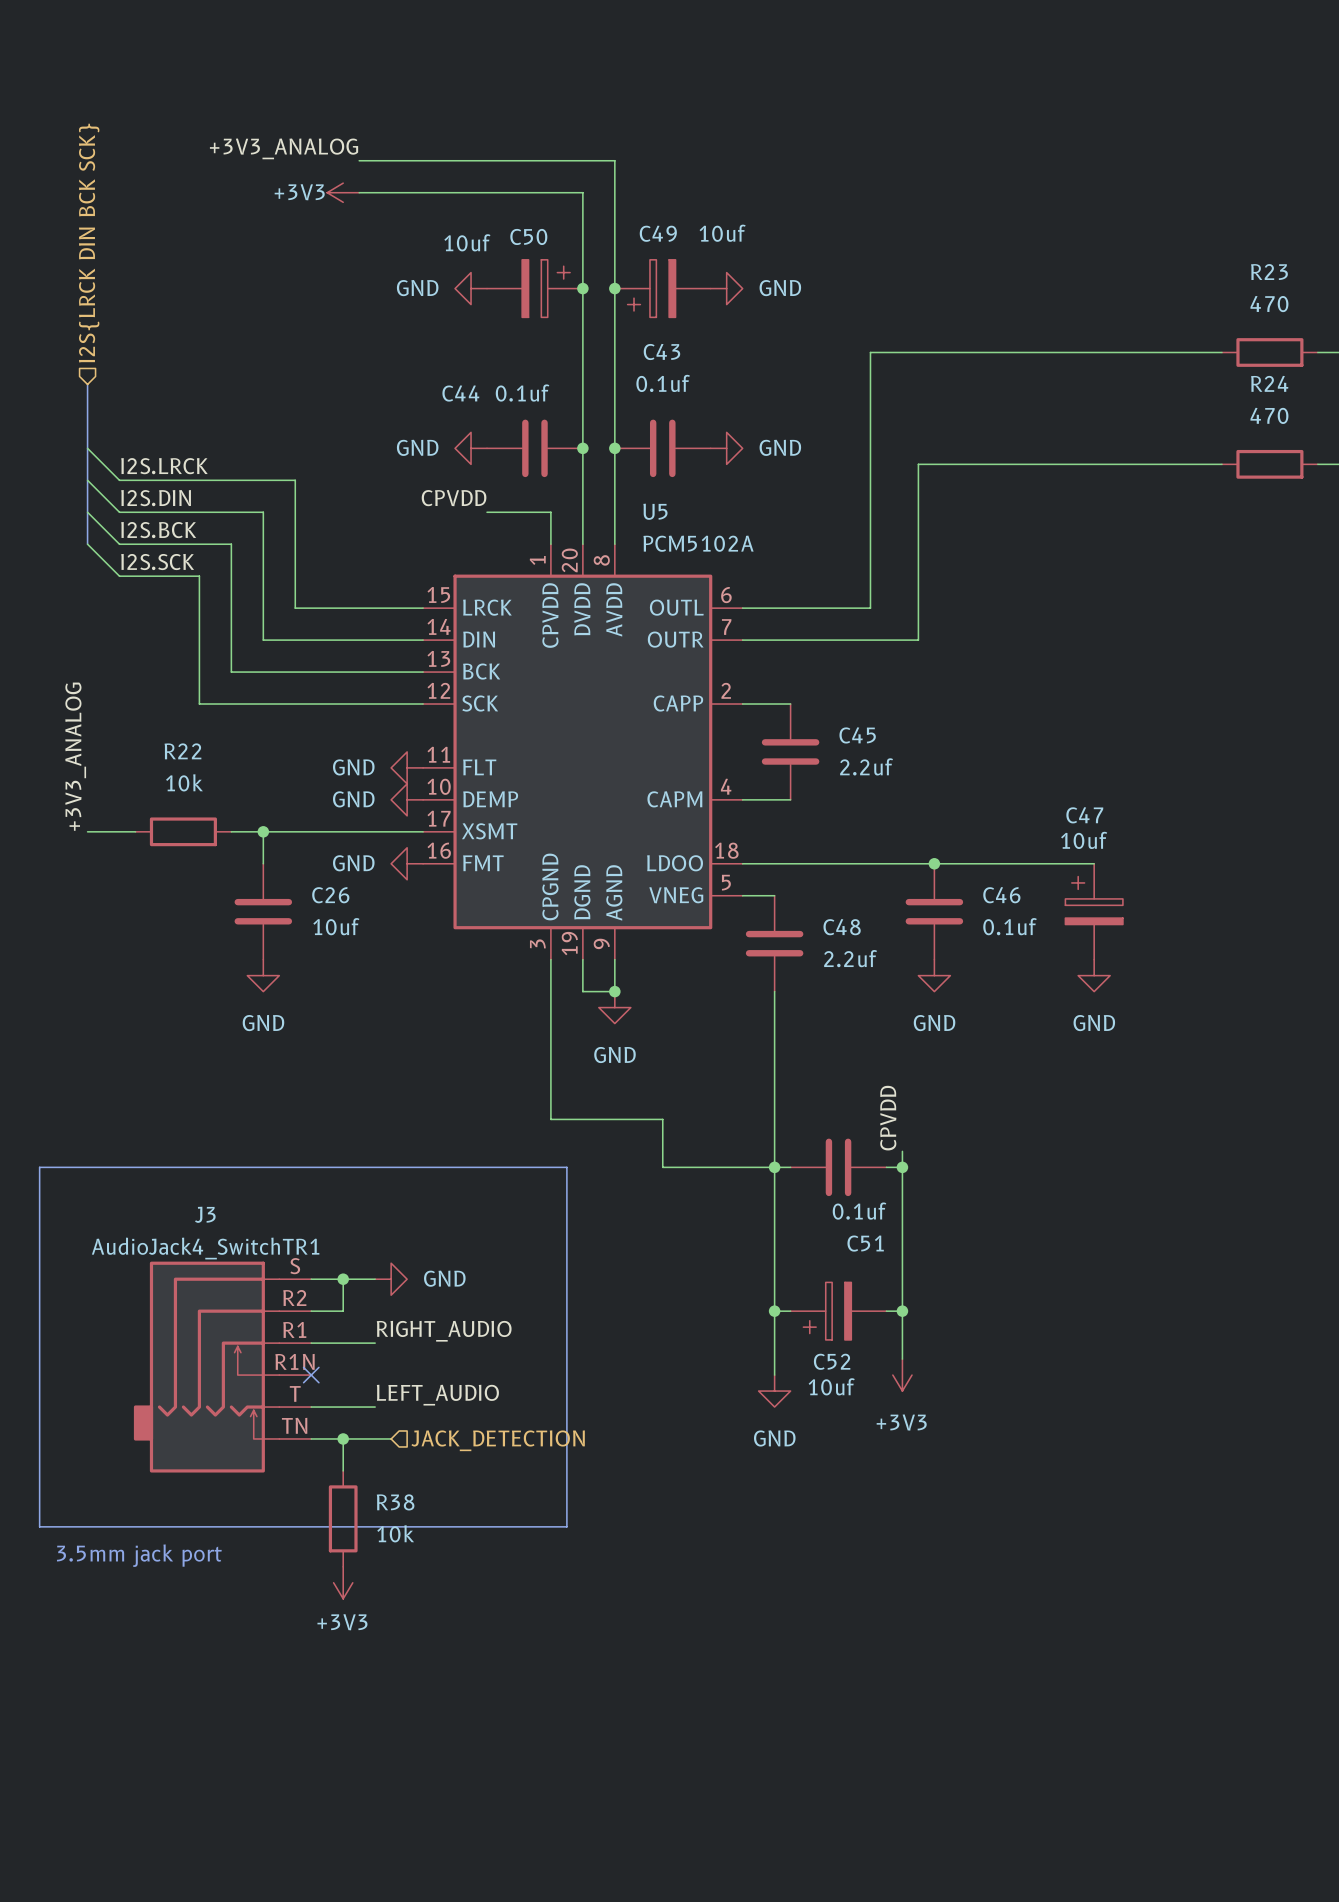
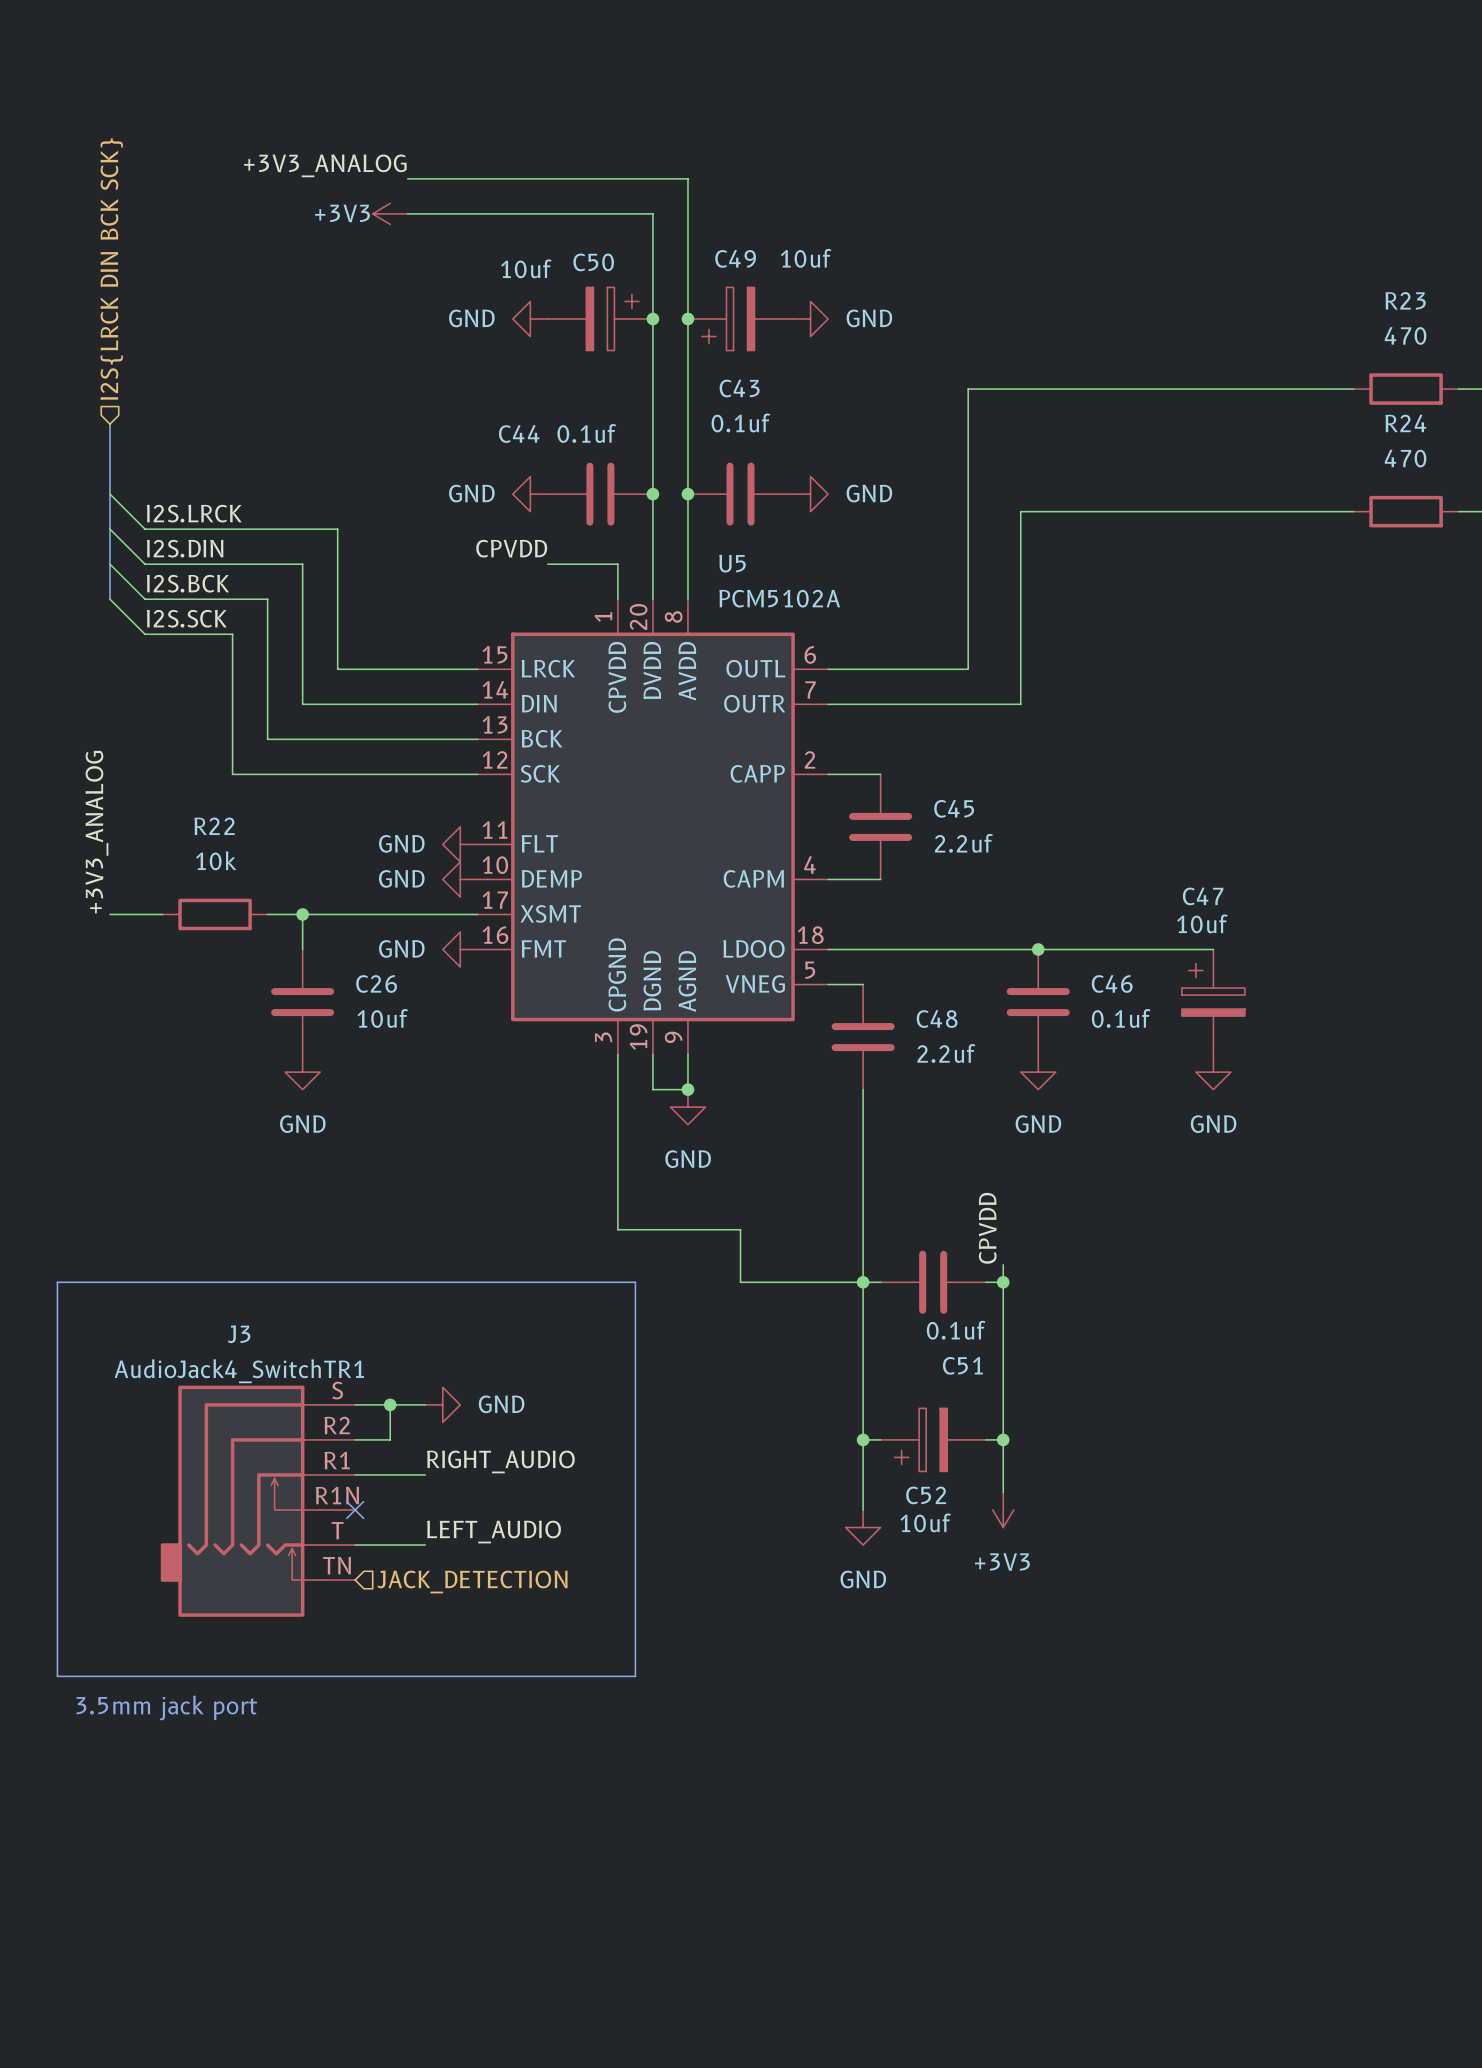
wire: (311, 1438) (391, 1438) -> none
wire: (343, 1438) (343, 1470) -> none
junction: (343, 1438) -> none
hierarchical label position: JACK_DETECTION (498, 1440) -> JACK_DETECTION (472, 1582)
R38: 10k (343, 1518) -> none
power symbol: +3V3 (343, 1582) -> none

